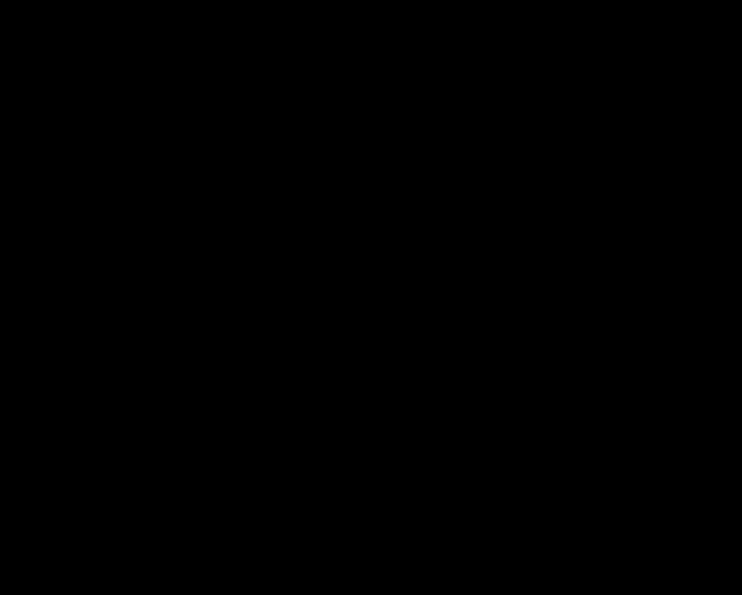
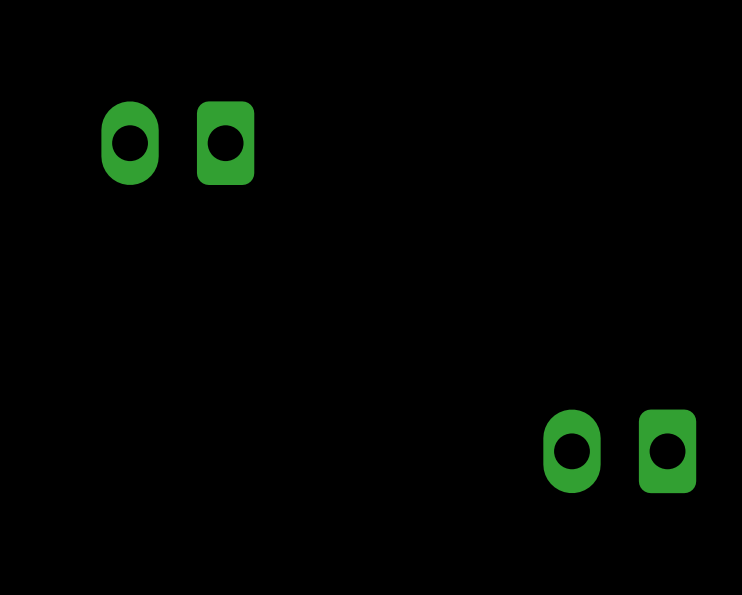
part: none -> (177, 143)
part: none -> (619, 451)

